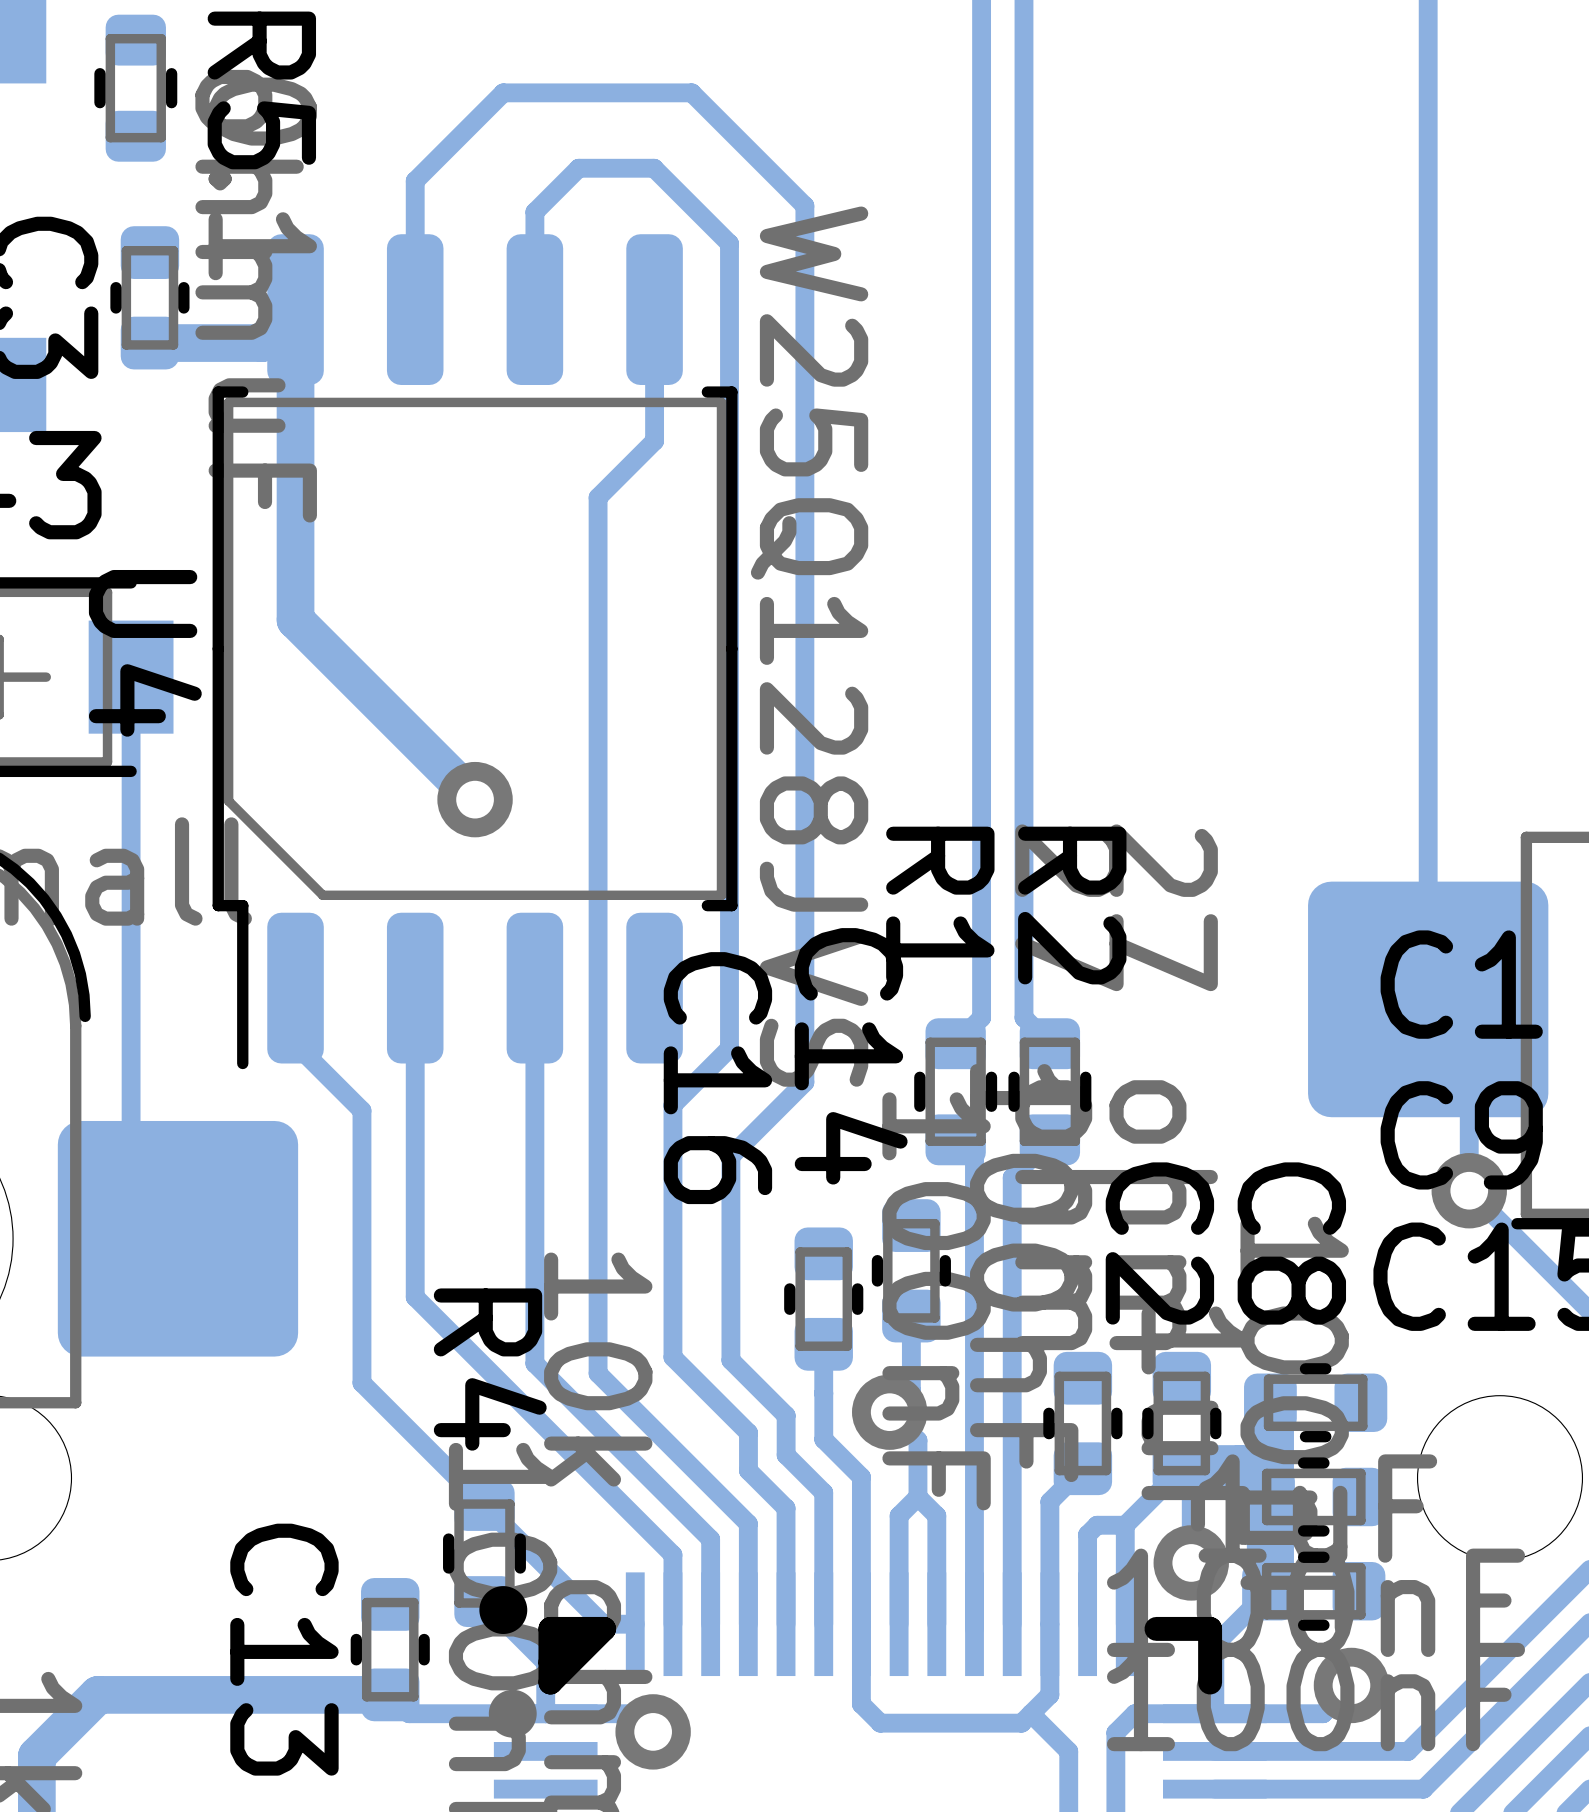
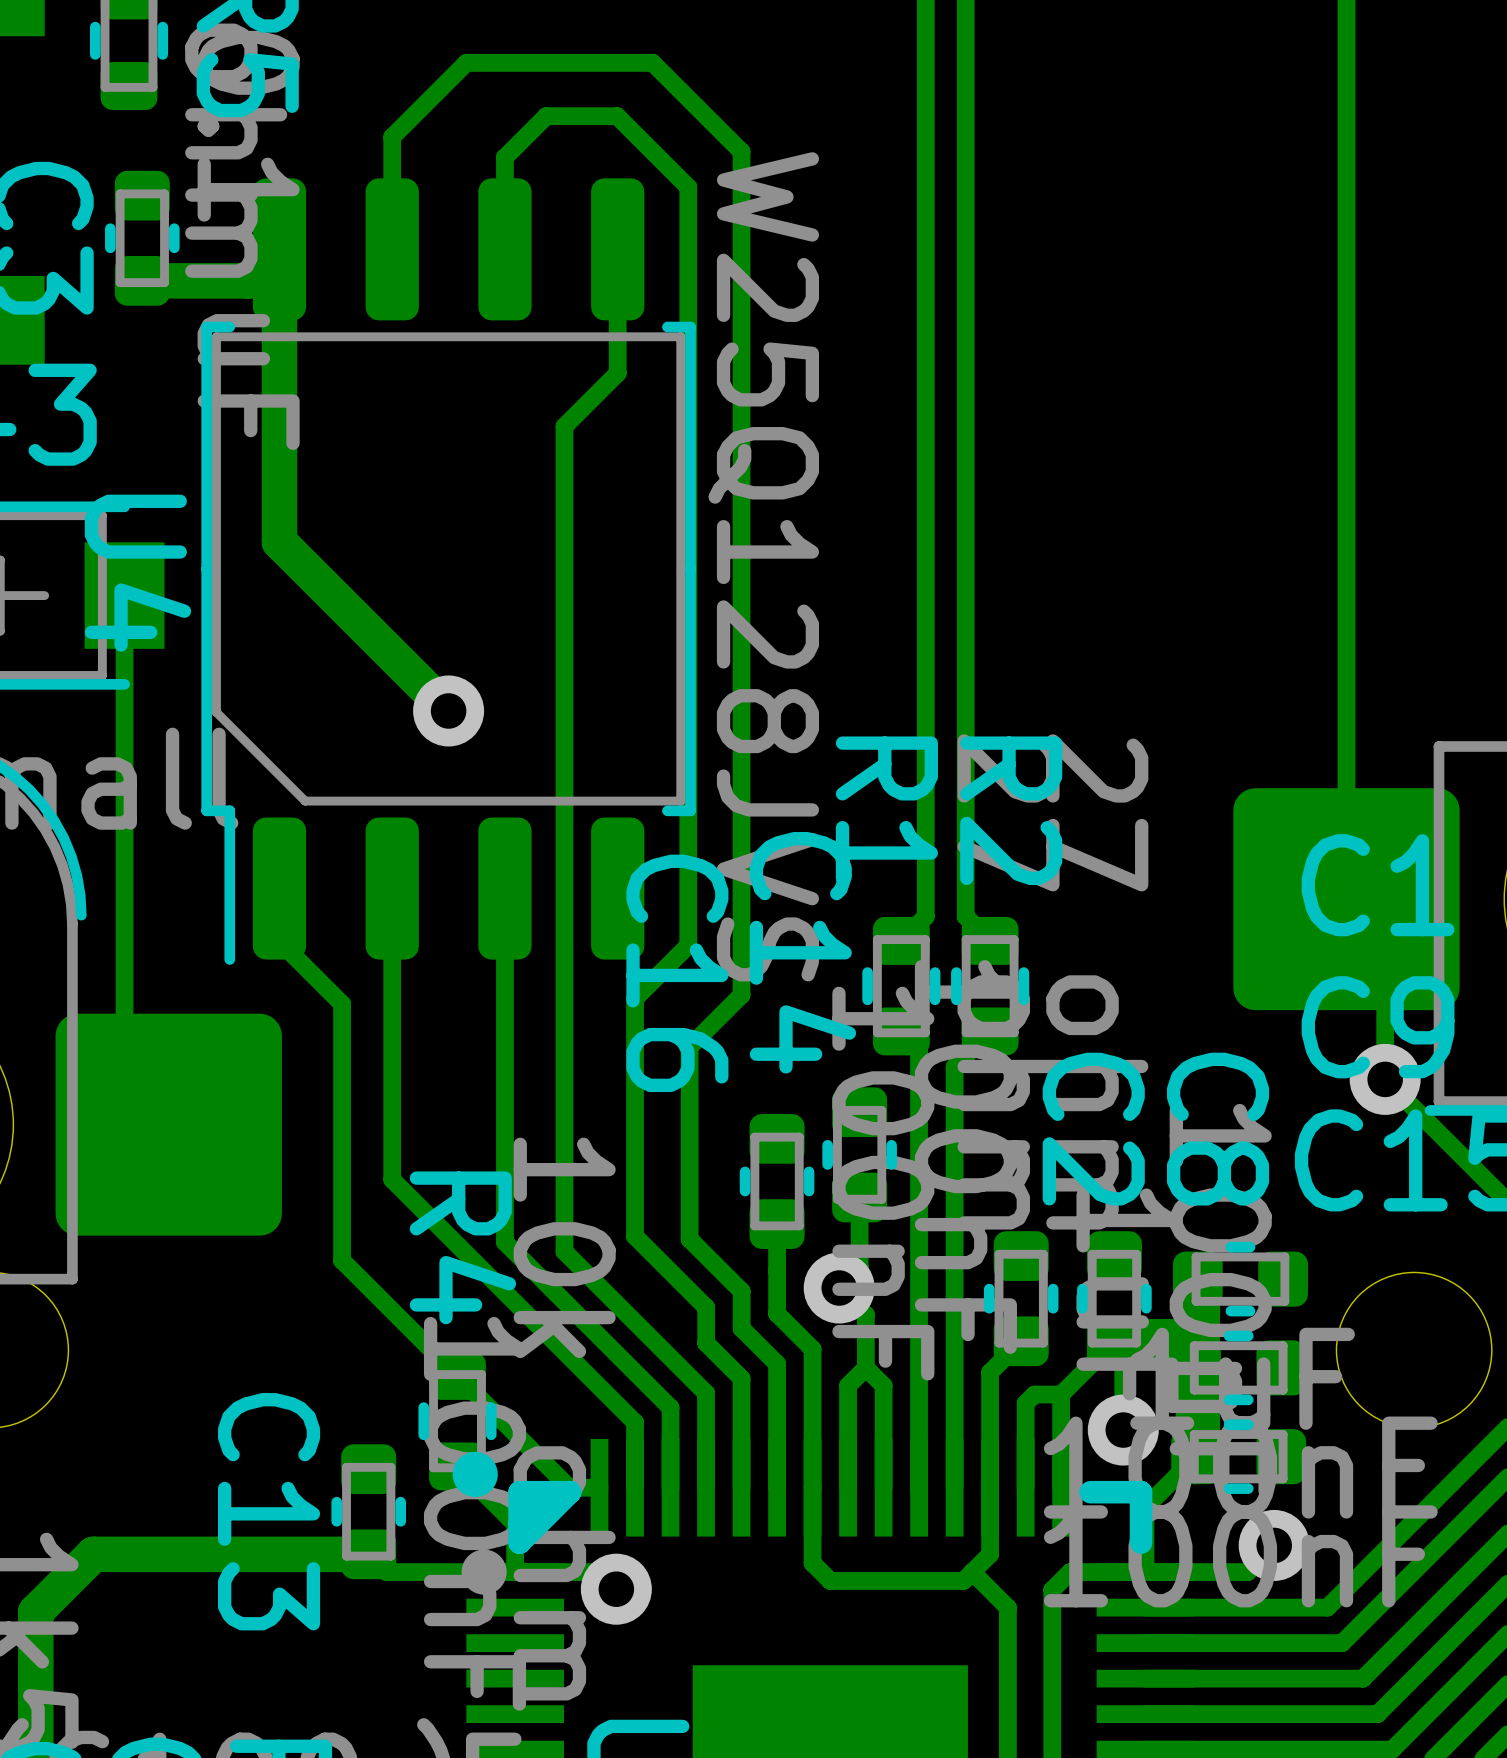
track: (415, 190) (415, 180) (503, 92) (691, 92) (804, 205) (804, 1082) (786, 1101) -> (392, 137) (466, 62) (652, 62) (741, 151) (741, 995)

